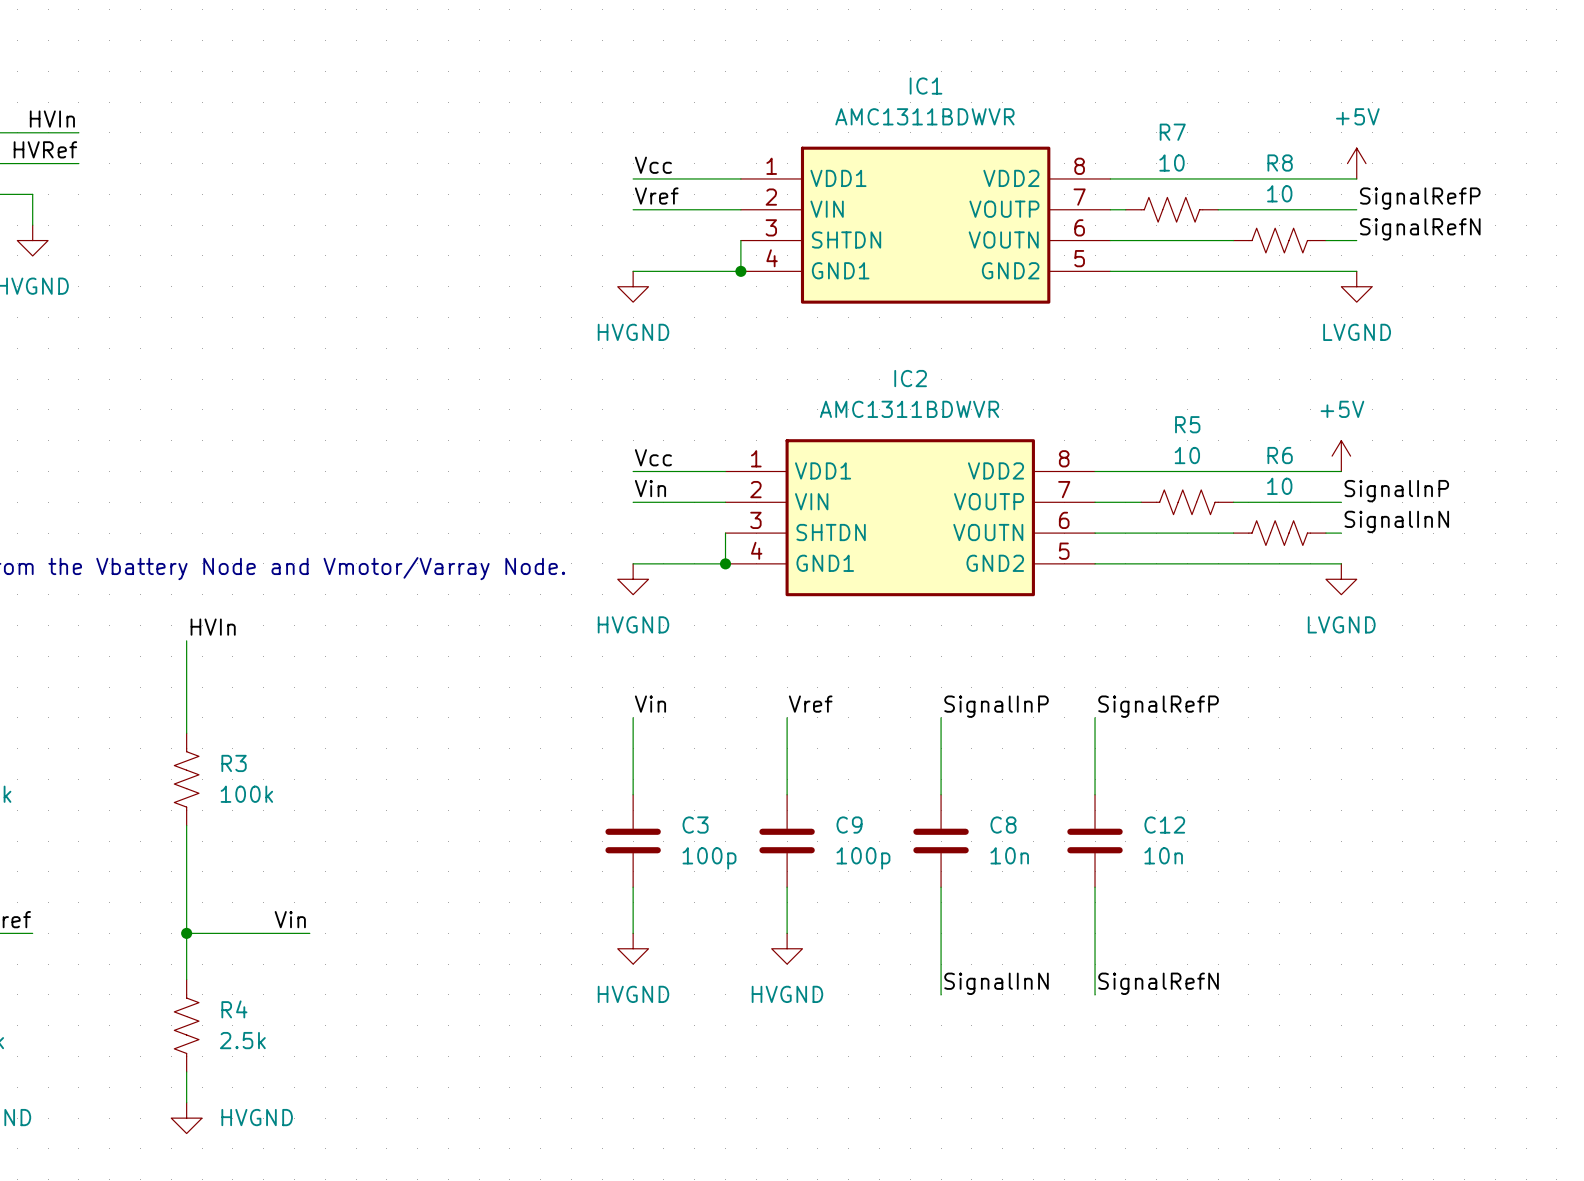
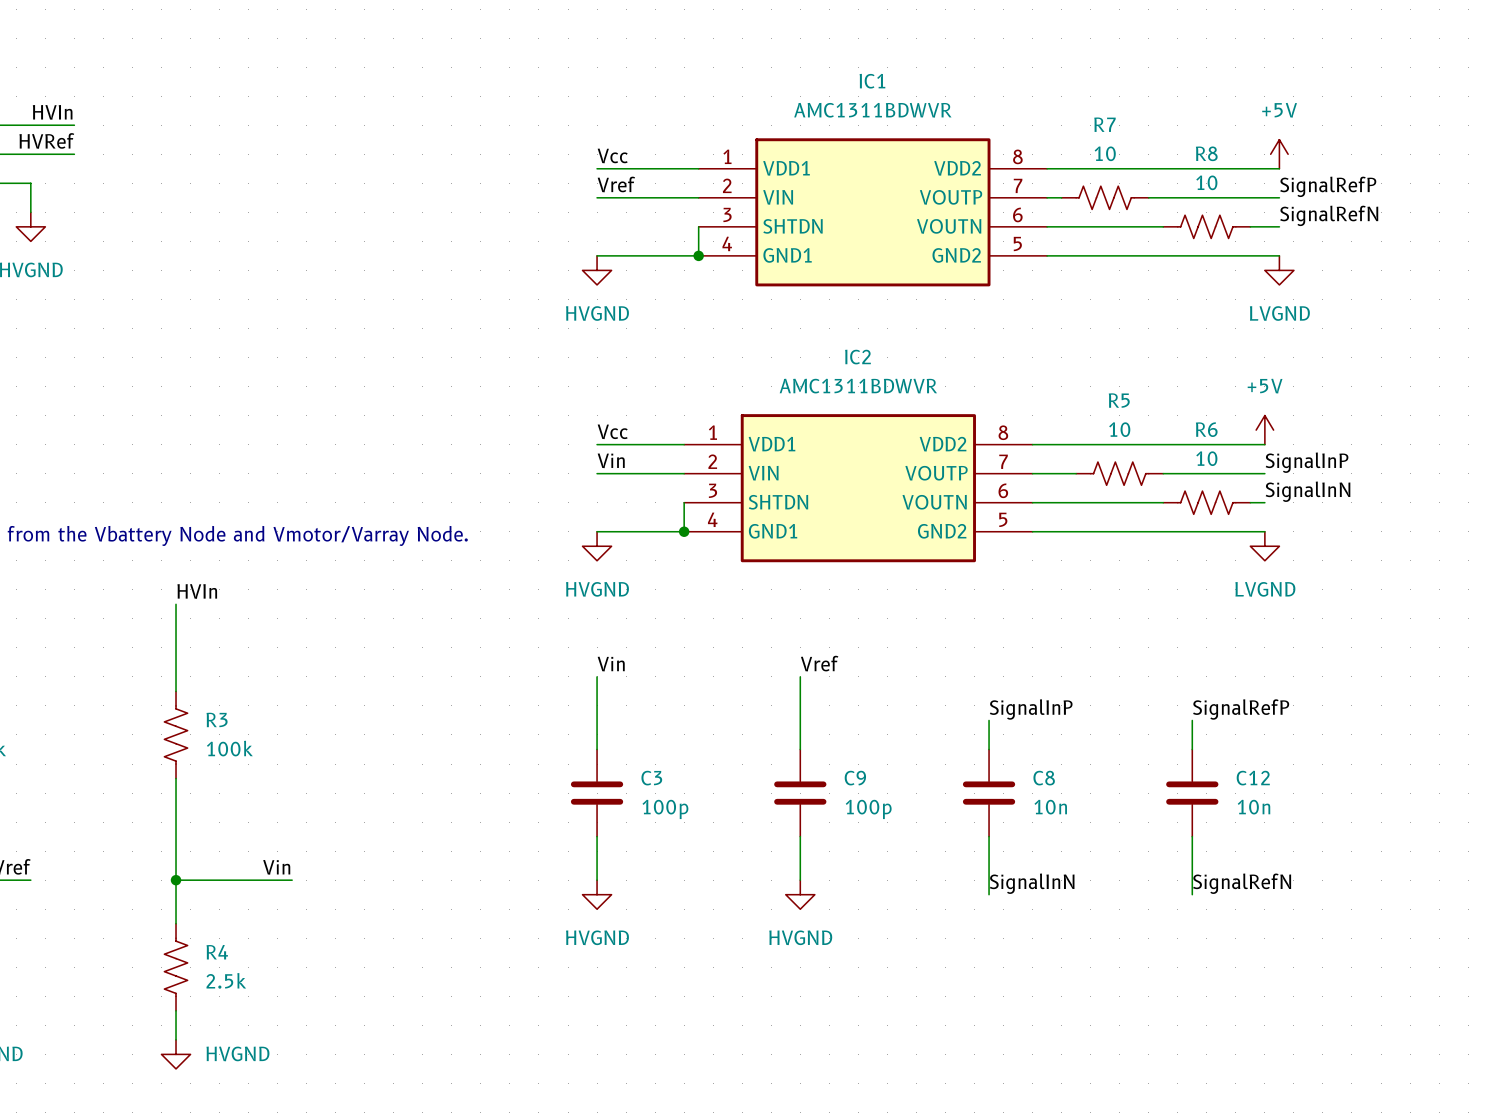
label position: Vref (810, 704) -> Vref (819, 663)
label position: SignalInP (996, 706) -> SignalInP (1031, 709)
label position: SignalRefP (1158, 706) -> SignalRefP (1241, 709)
wire: (787, 717) (787, 794) -> (800, 676) (800, 749)
wire: (941, 717) (941, 794) -> none
wire: (1095, 717) (1095, 794) -> none
wire: none -> (989, 720) (989, 749)
wire: none -> (1192, 720) (1192, 749)
C9 position: (787, 841) -> (800, 793)
C8 position: (941, 841) -> (989, 793)
C12 position: (1095, 841) -> (1192, 793)
wire: (787, 887) (787, 933) -> (800, 836) (800, 880)
wire: (941, 887) (941, 994) -> none
wire: none -> (989, 836) (989, 894)
wire: (1095, 887) (1095, 994) -> none
wire: none -> (1192, 836) (1192, 894)
power symbol position: HVGND (787, 948) -> HVGND (800, 894)
label position: SignalInN (996, 983) -> SignalInN (1032, 883)
label position: SignalRefN (1158, 983) -> SignalRefN (1242, 883)

